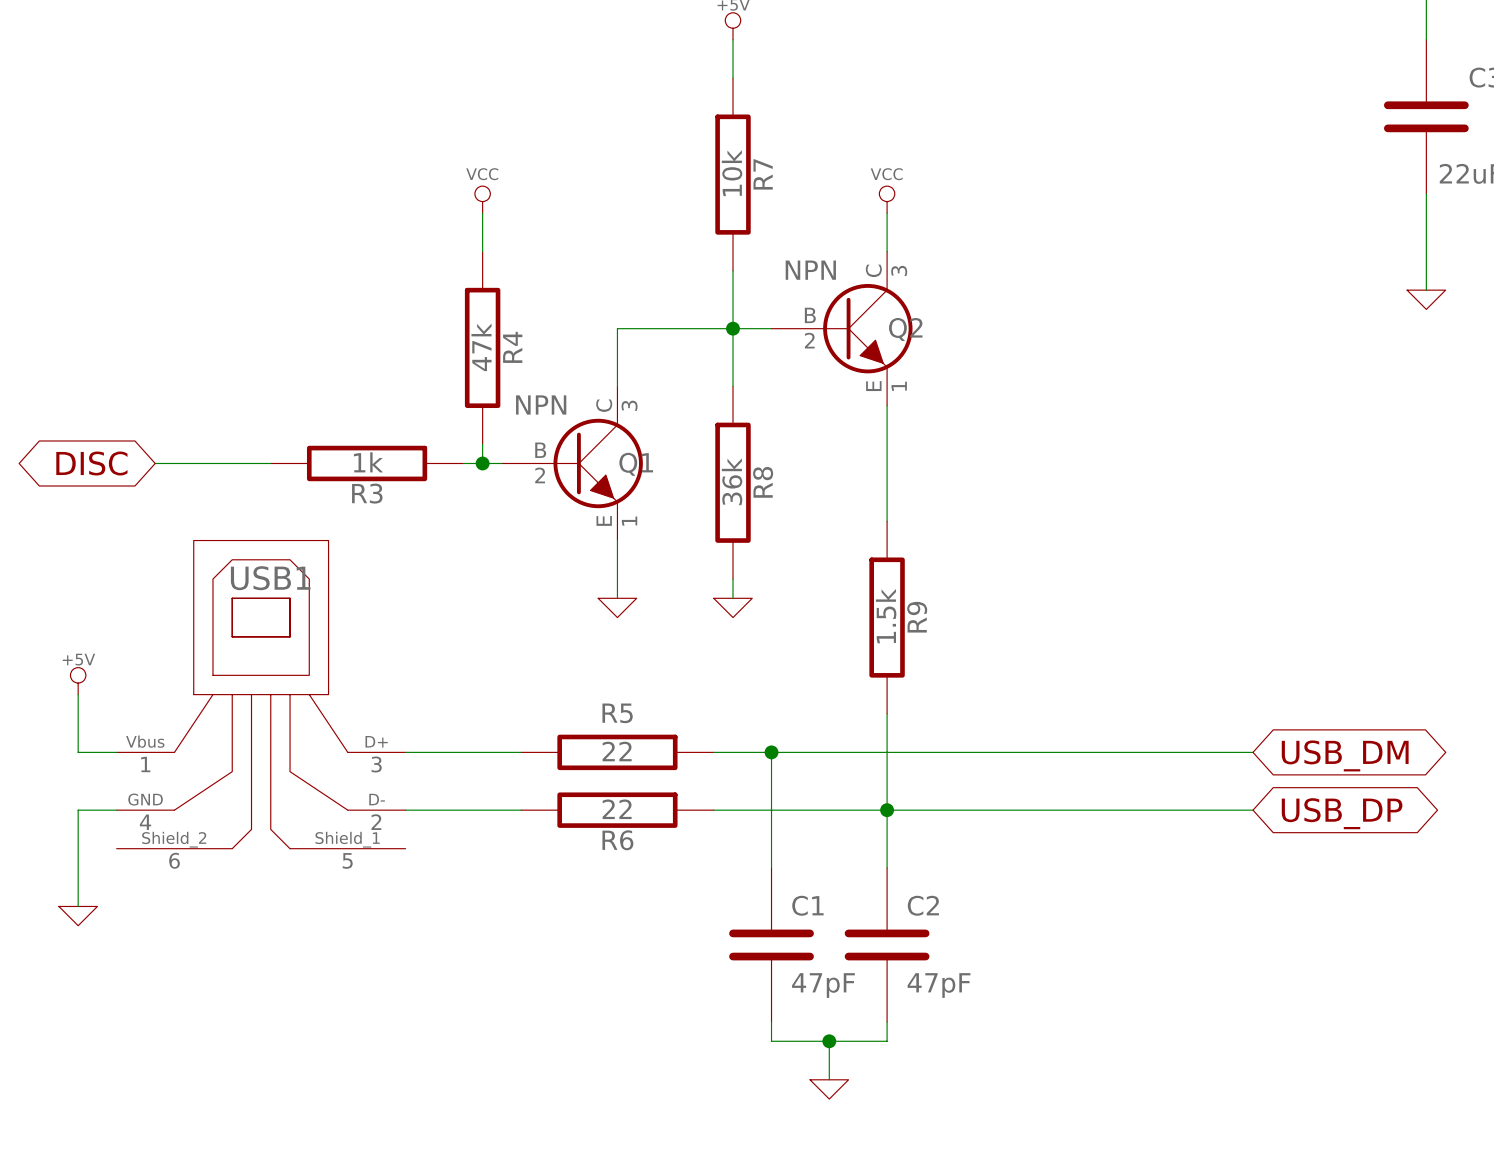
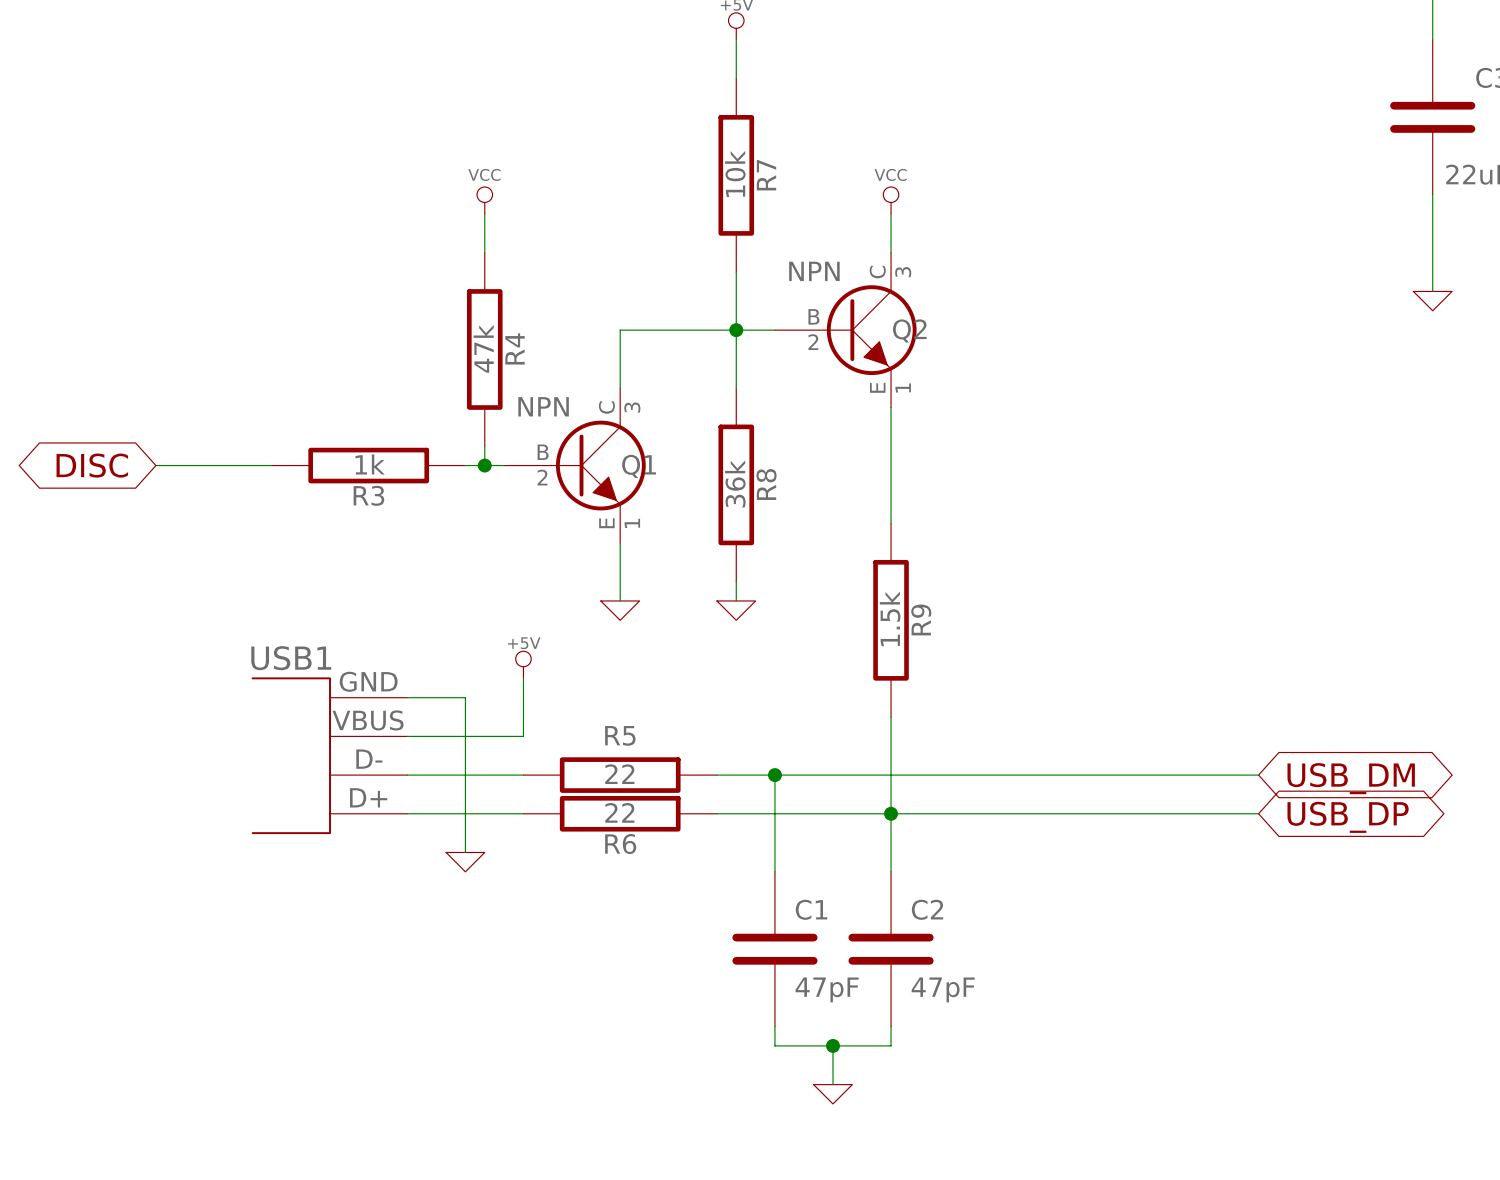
USB1 symbol: [116, 540, 406, 849] -> [251, 677, 408, 835]
USB1 name position: USB1 (270, 578) -> USB1 (291, 658)
power symbol: none -> +5V (523, 664)
wire: none -> (523, 678) (523, 736) (407, 736)
power symbol: +5V (78, 681) -> none
wire: (78, 694) (78, 752) (116, 752) -> none
wire: none -> (407, 697) (465, 697) (465, 852)
wire: (405, 752) (521, 752) -> (407, 775) (523, 775)
R5 position: (617, 752) -> (620, 775)
wire: (713, 752) (1253, 752) -> (716, 775) (1258, 775)
wire: (771, 752) (771, 771) -> none
junction position: (771, 752) -> (774, 775)
global label position: USB_DM (1345, 755) -> USB_DM (1351, 778)
wire: (116, 810) (78, 810) (78, 906) -> none
power symbol: none -> (465, 862)
power symbol: (78, 916) -> none

